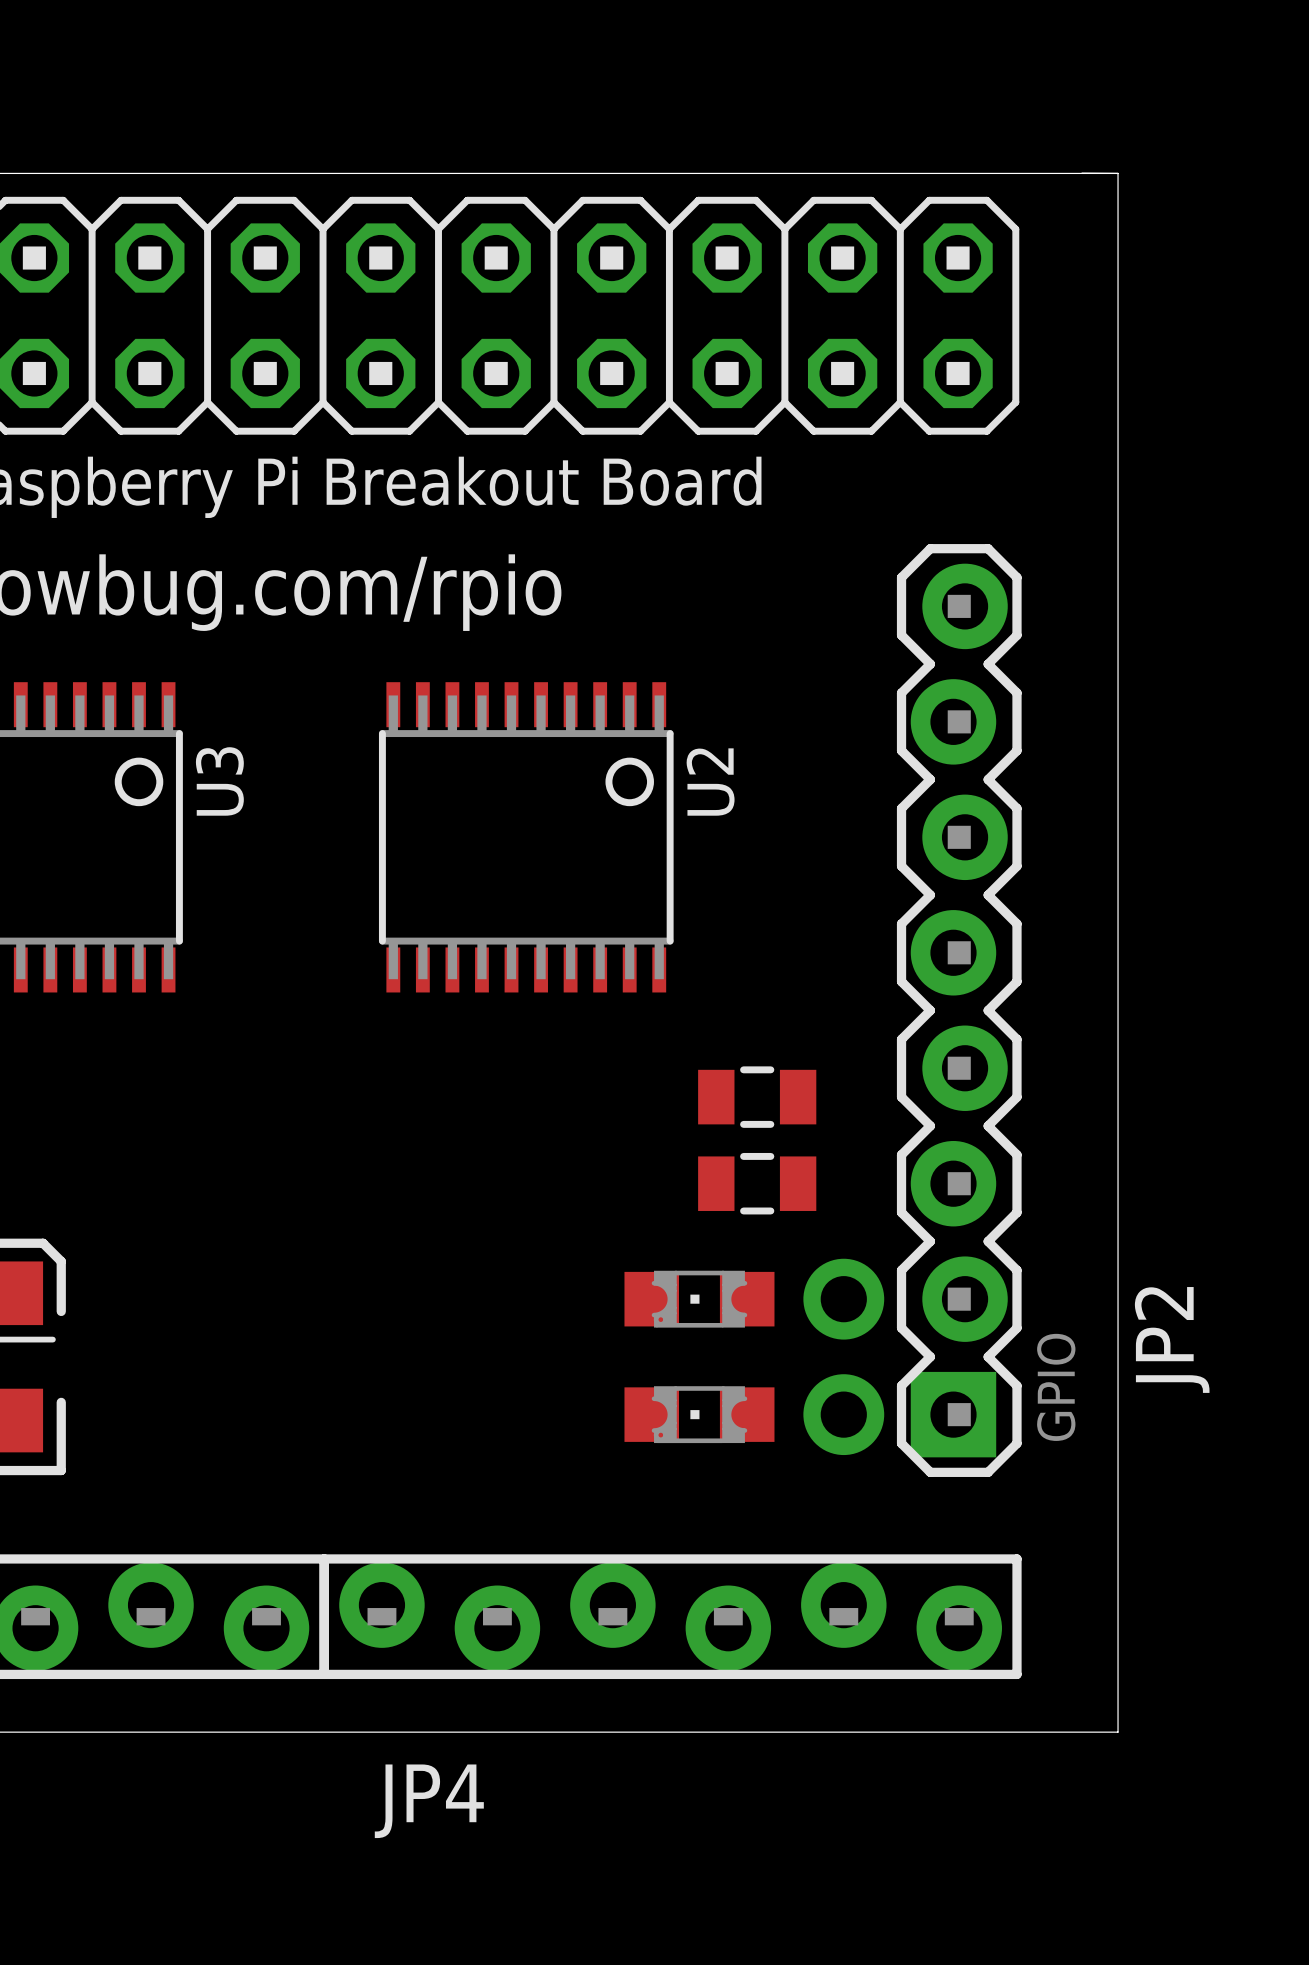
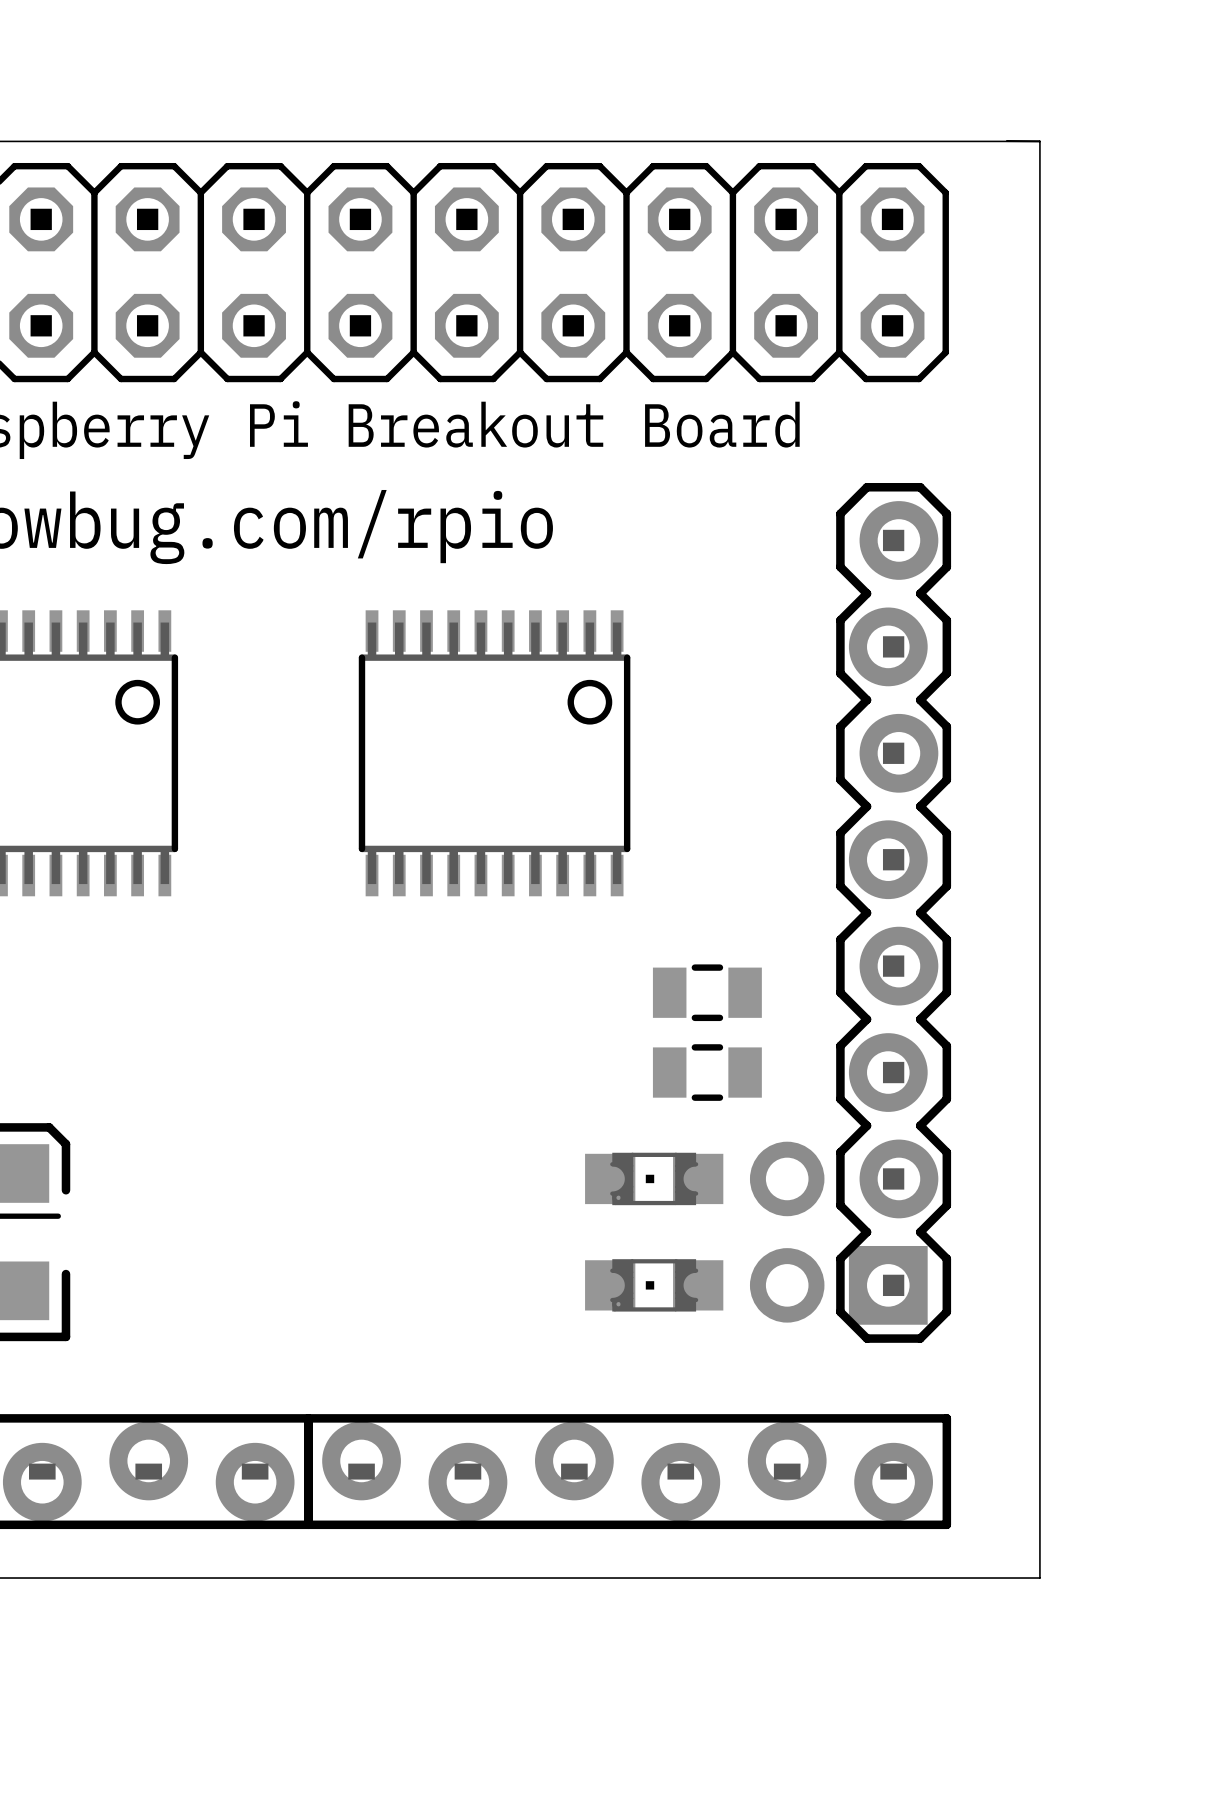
U3 name: U3 (219, 781) -> none
U2 name: U2 (710, 782) -> none
JP2 name: JP2 (1172, 1339) -> none
JP2 value: GPIO (1056, 1387) -> none
JP4 name: JP4 (429, 1801) -> none

